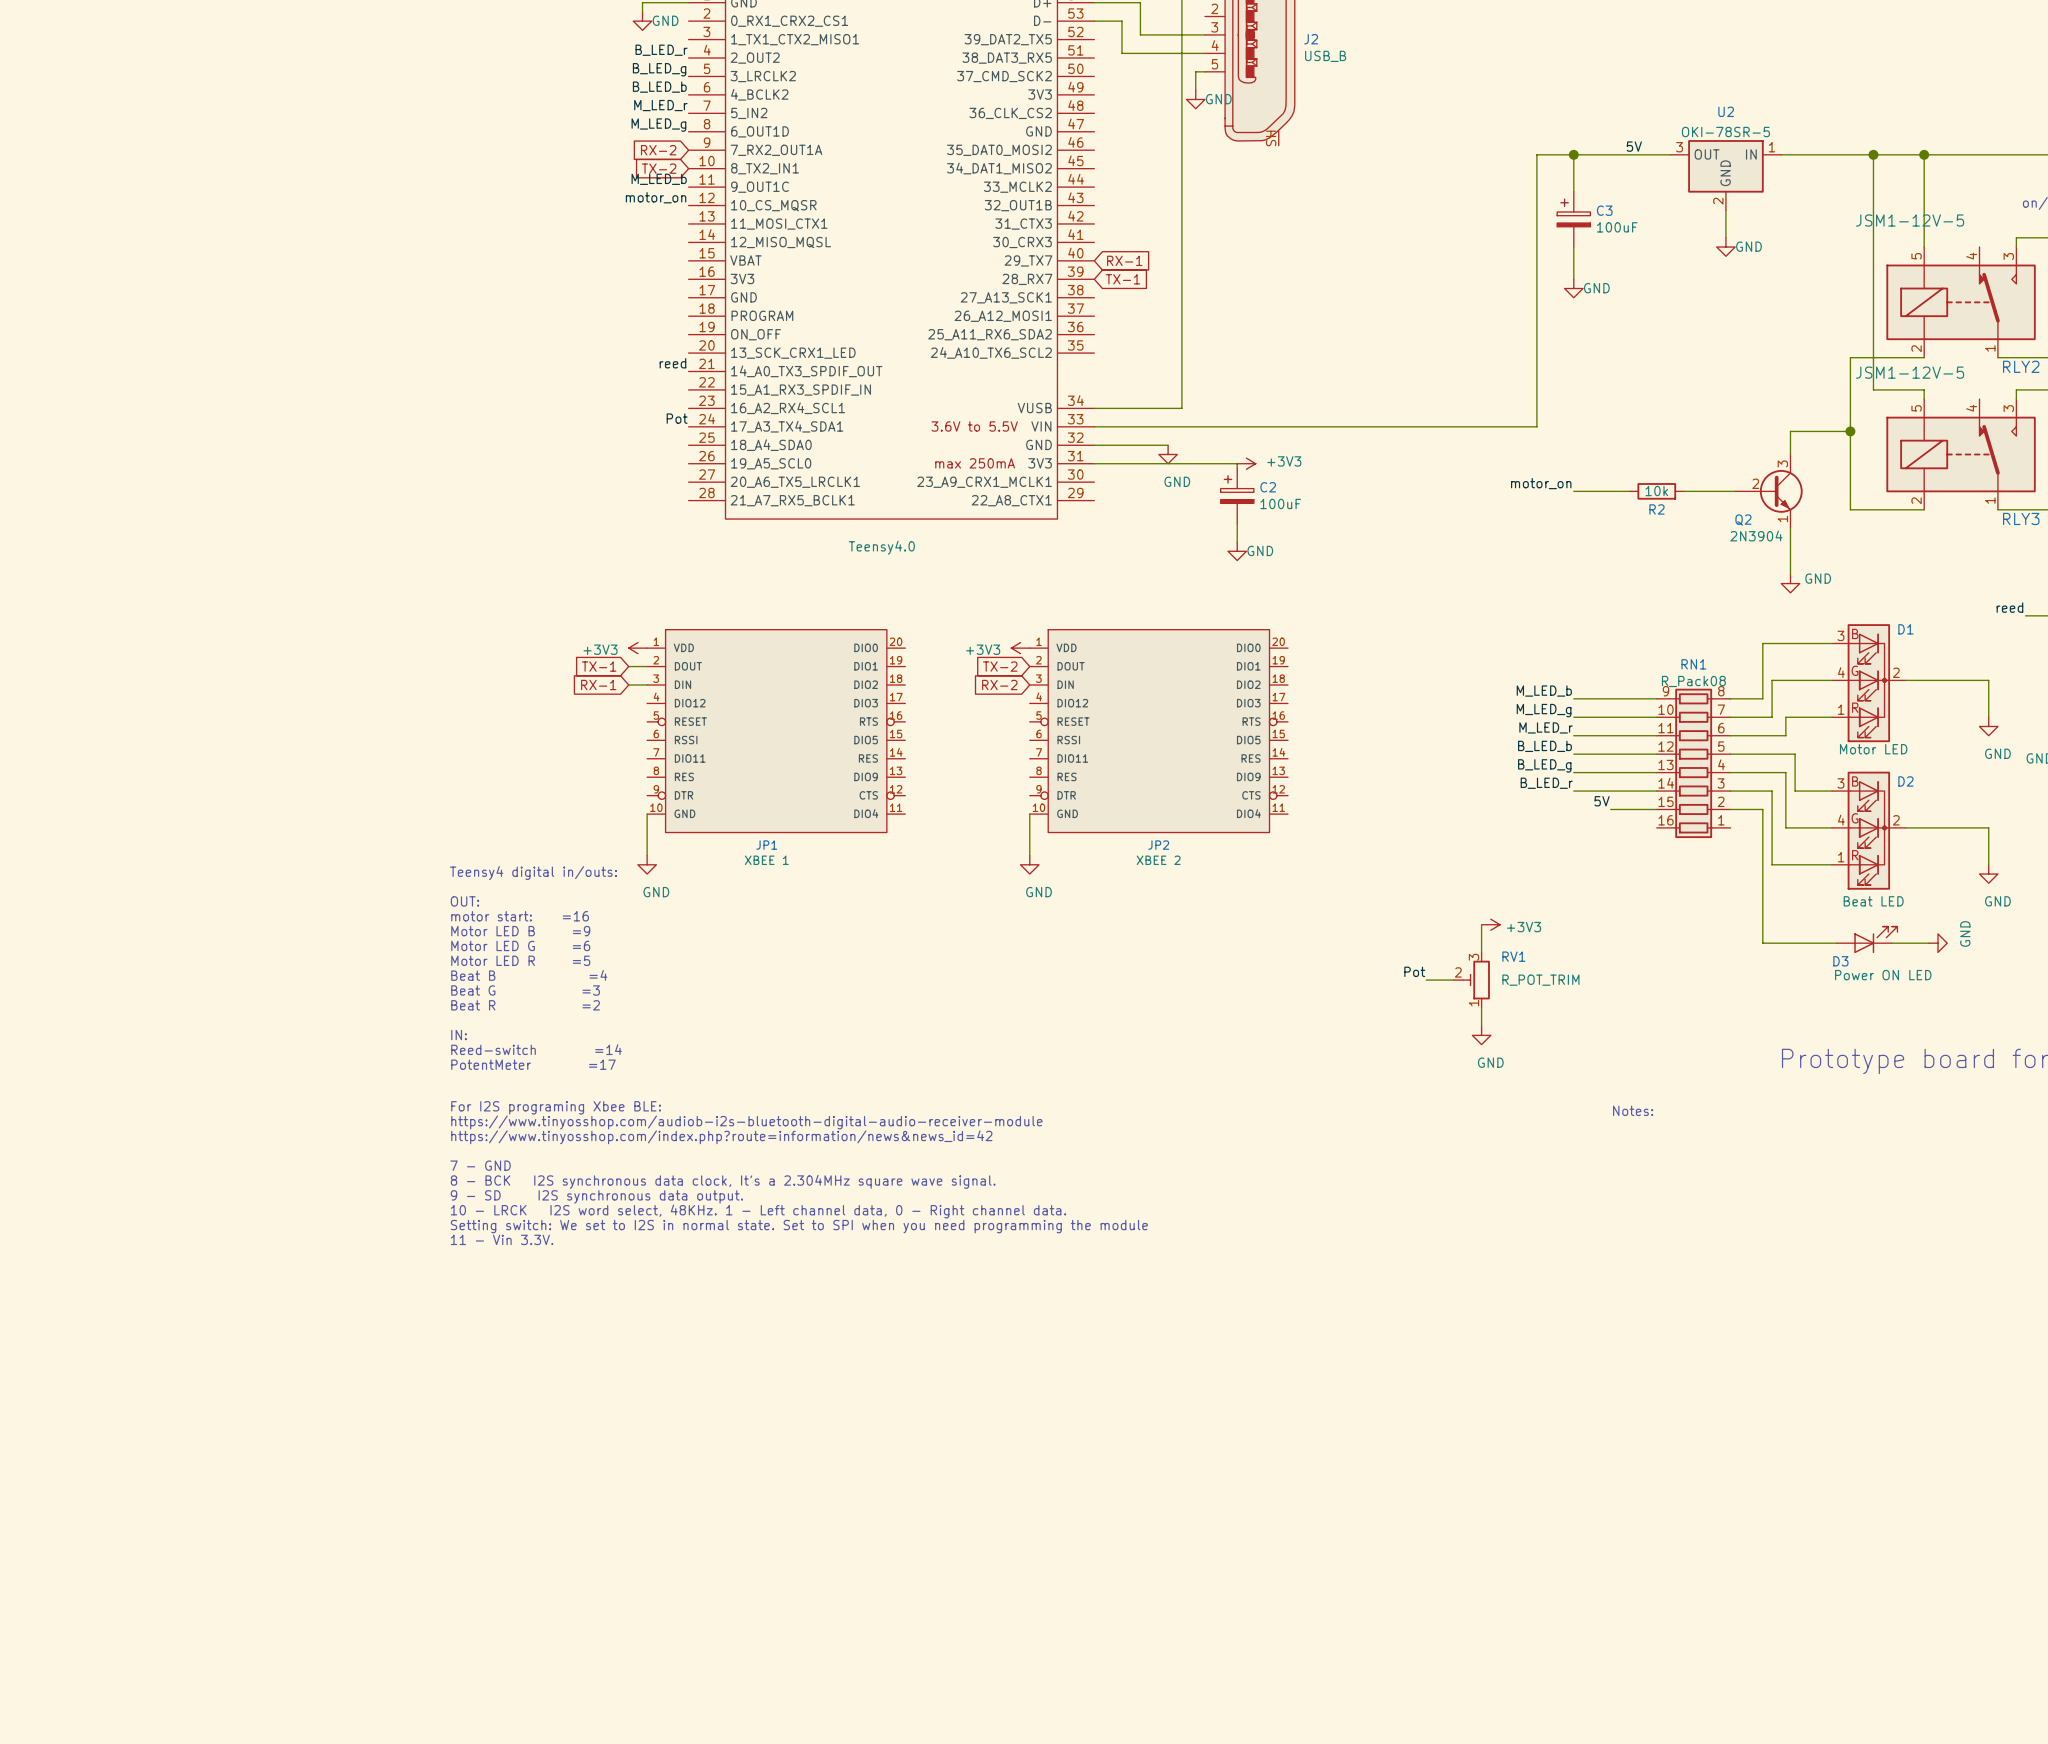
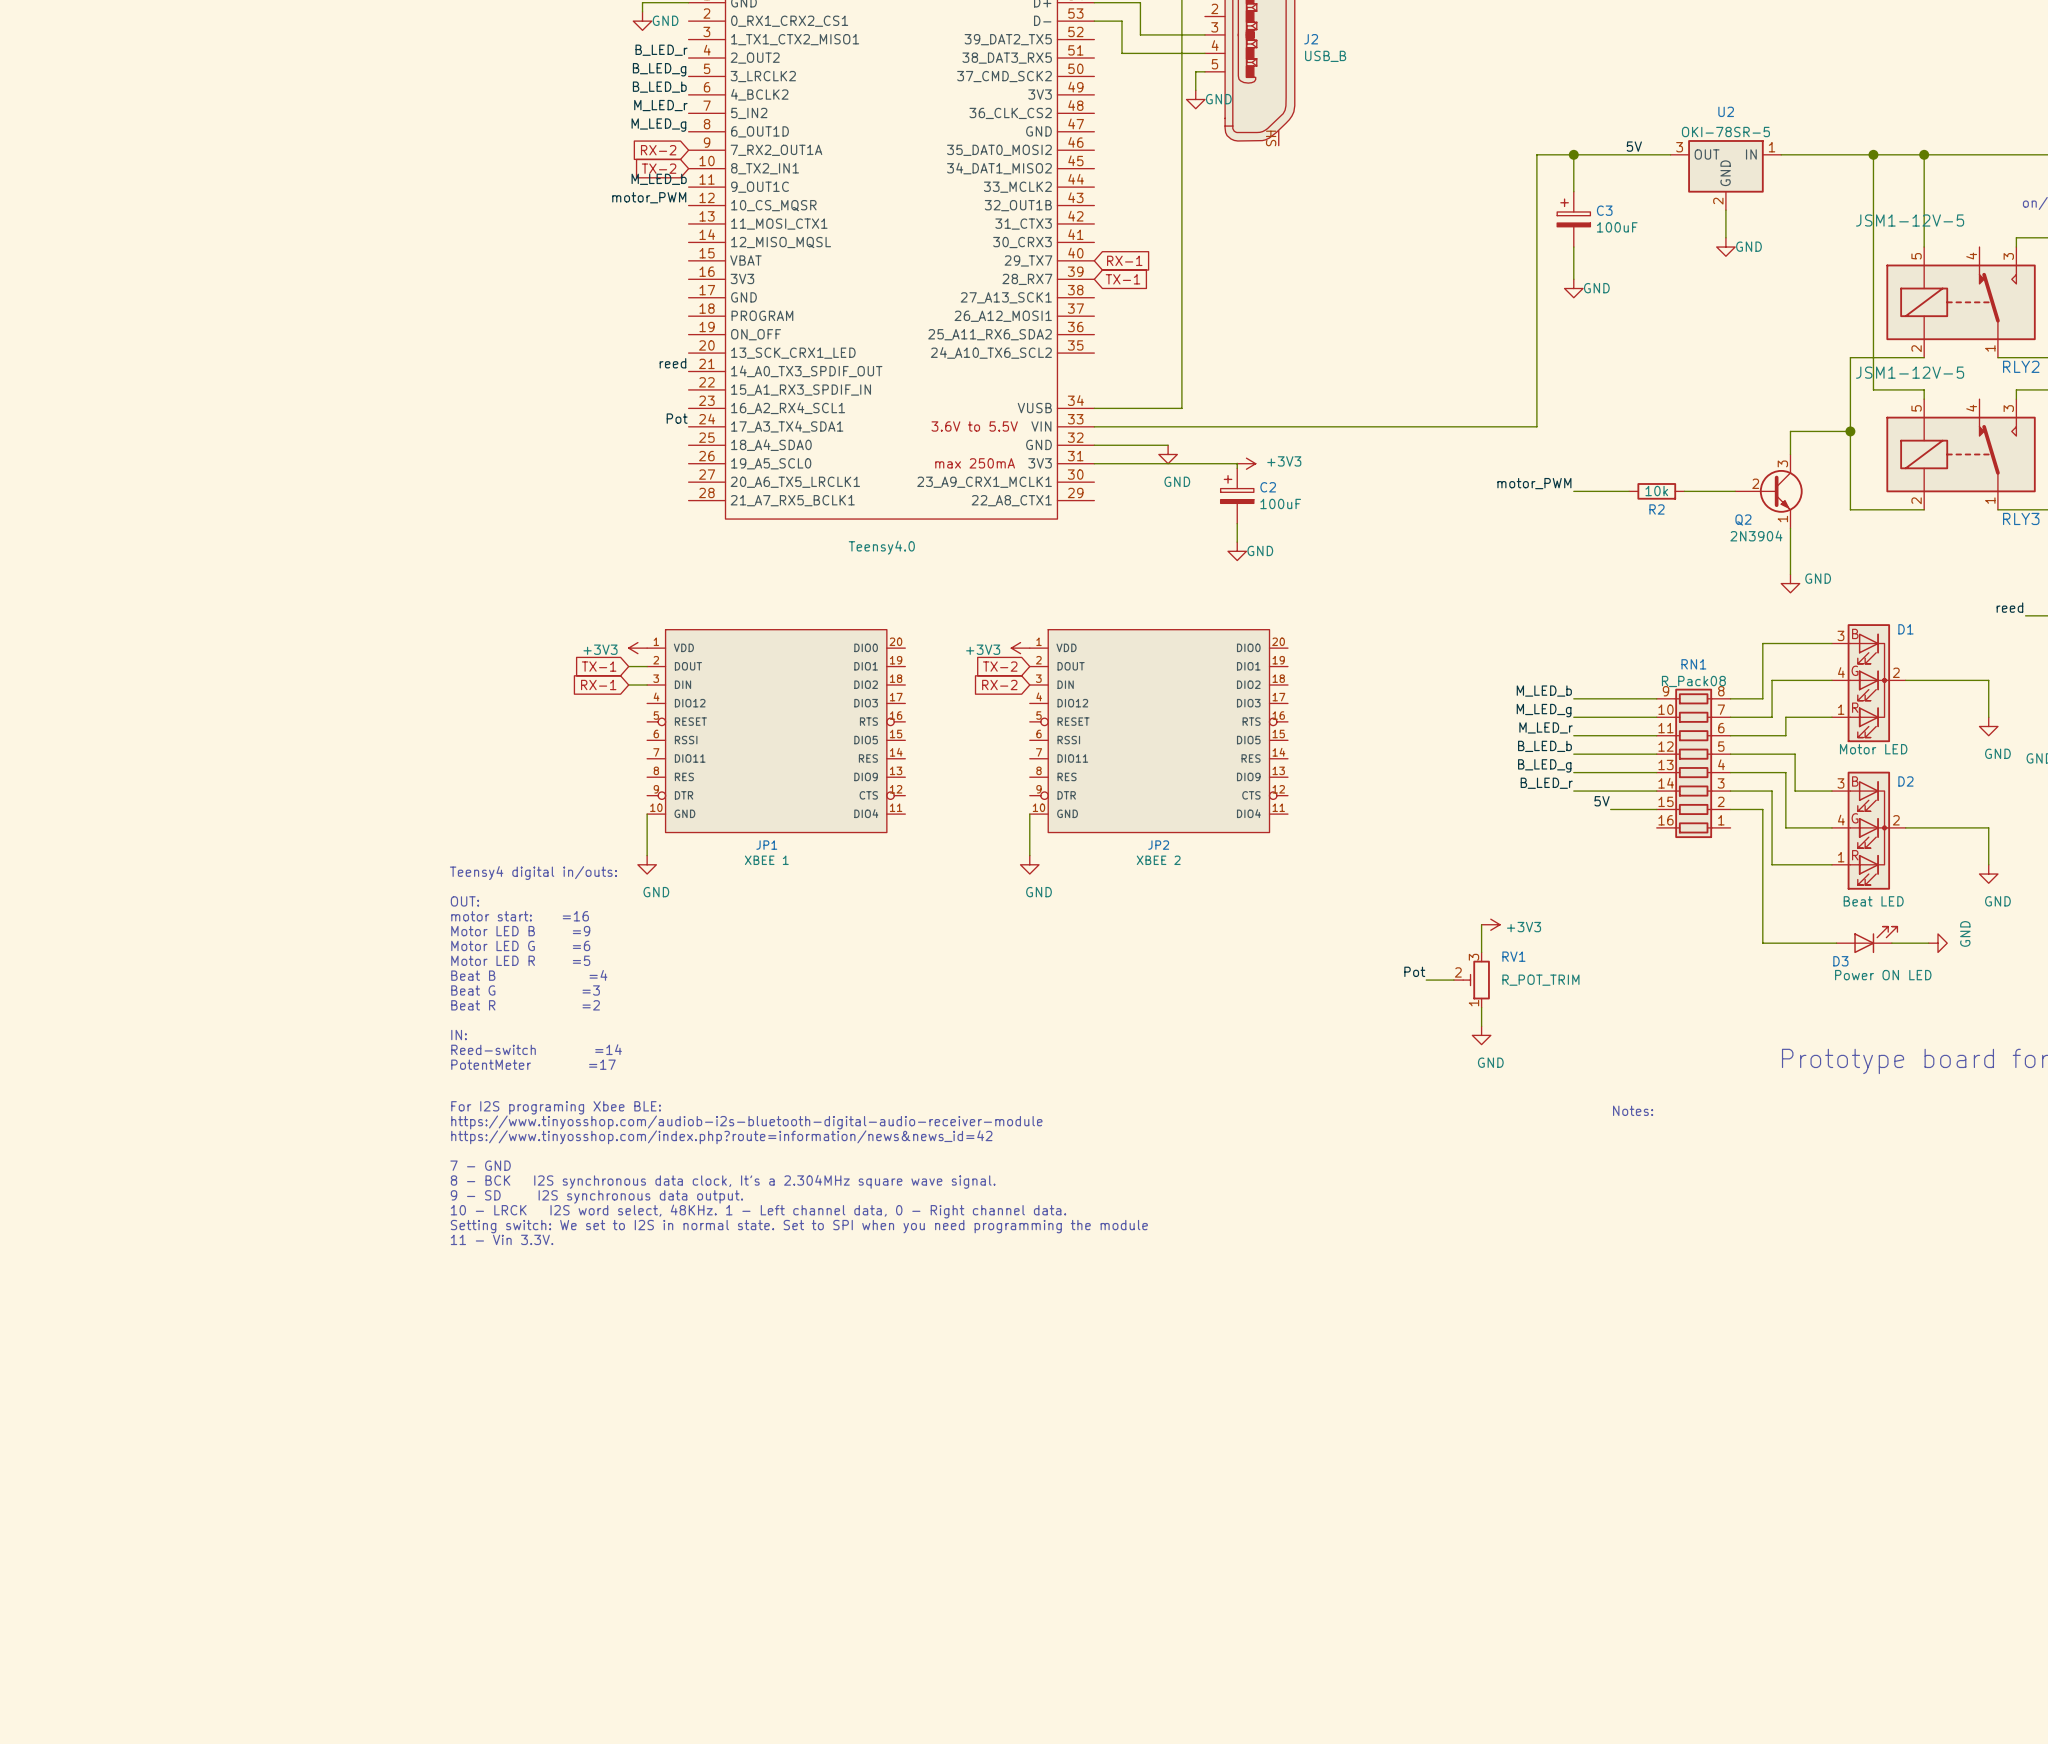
label: motor_on (656, 197) -> motor_PWM (649, 197)
label: motor_on (1541, 483) -> motor_PWM (1534, 483)

